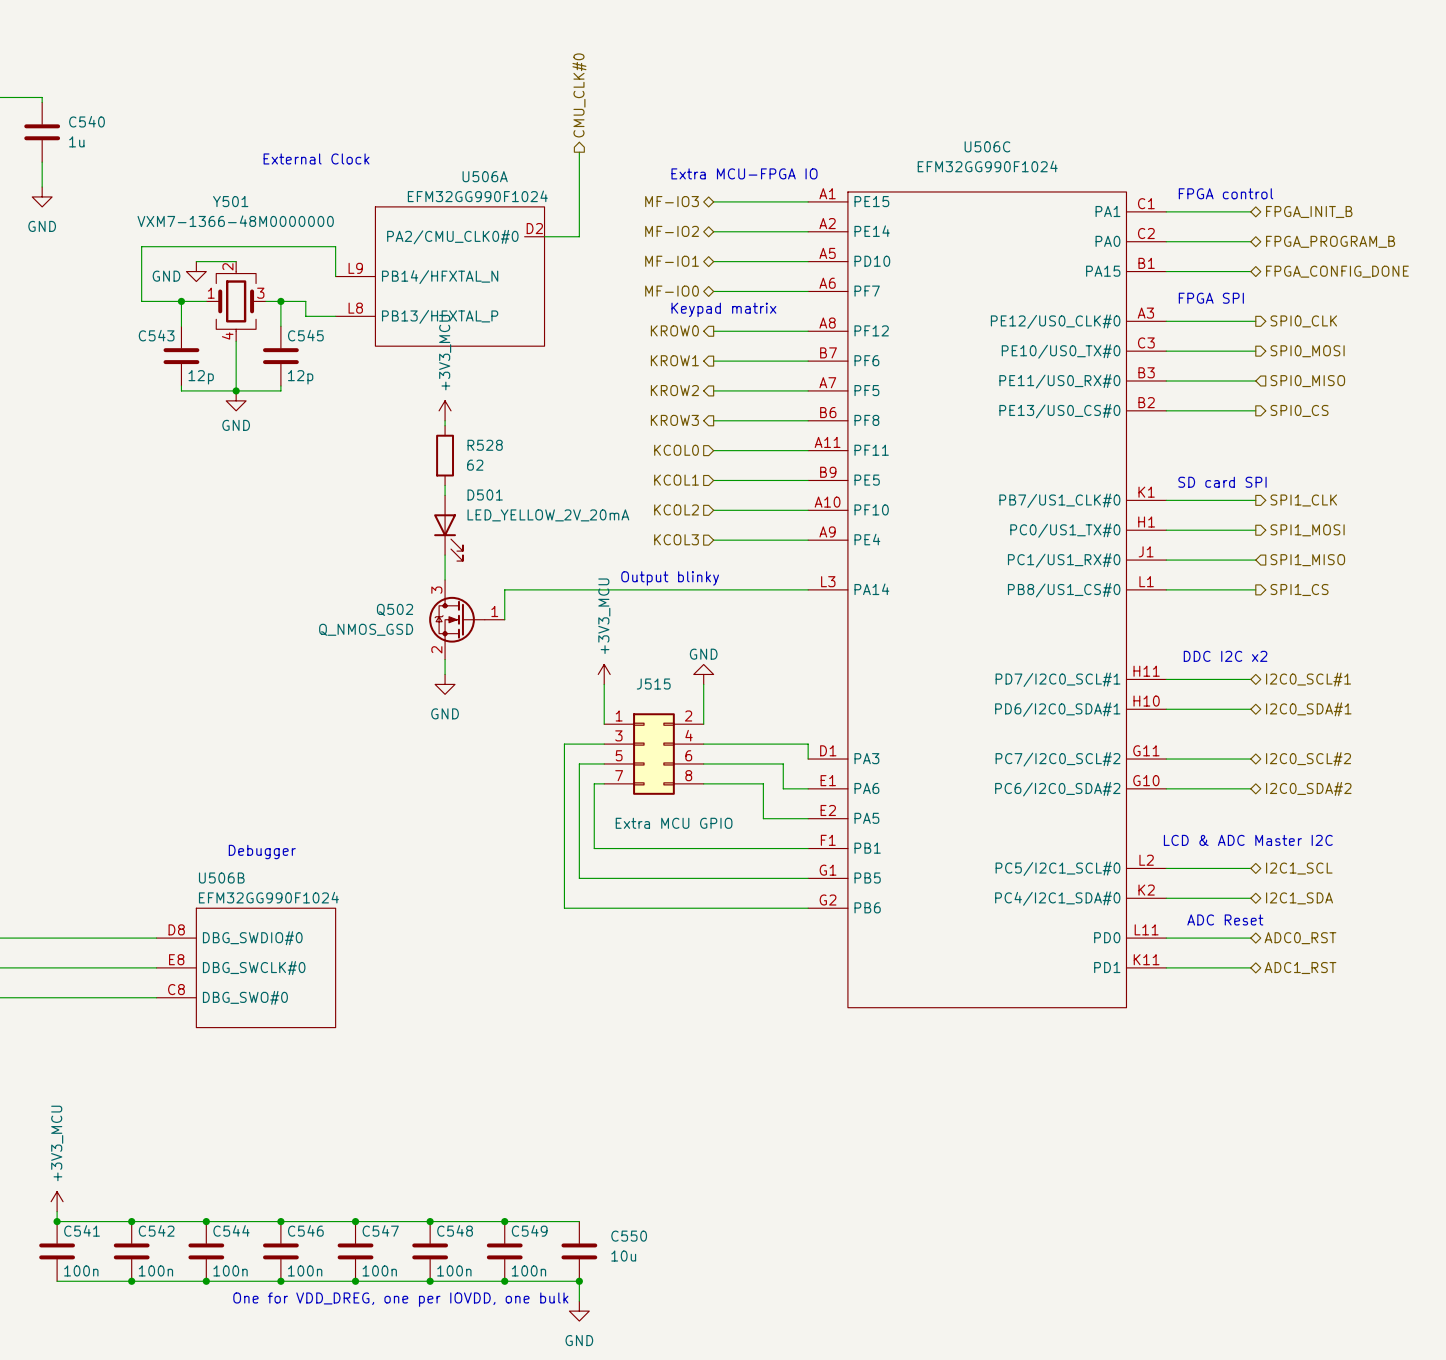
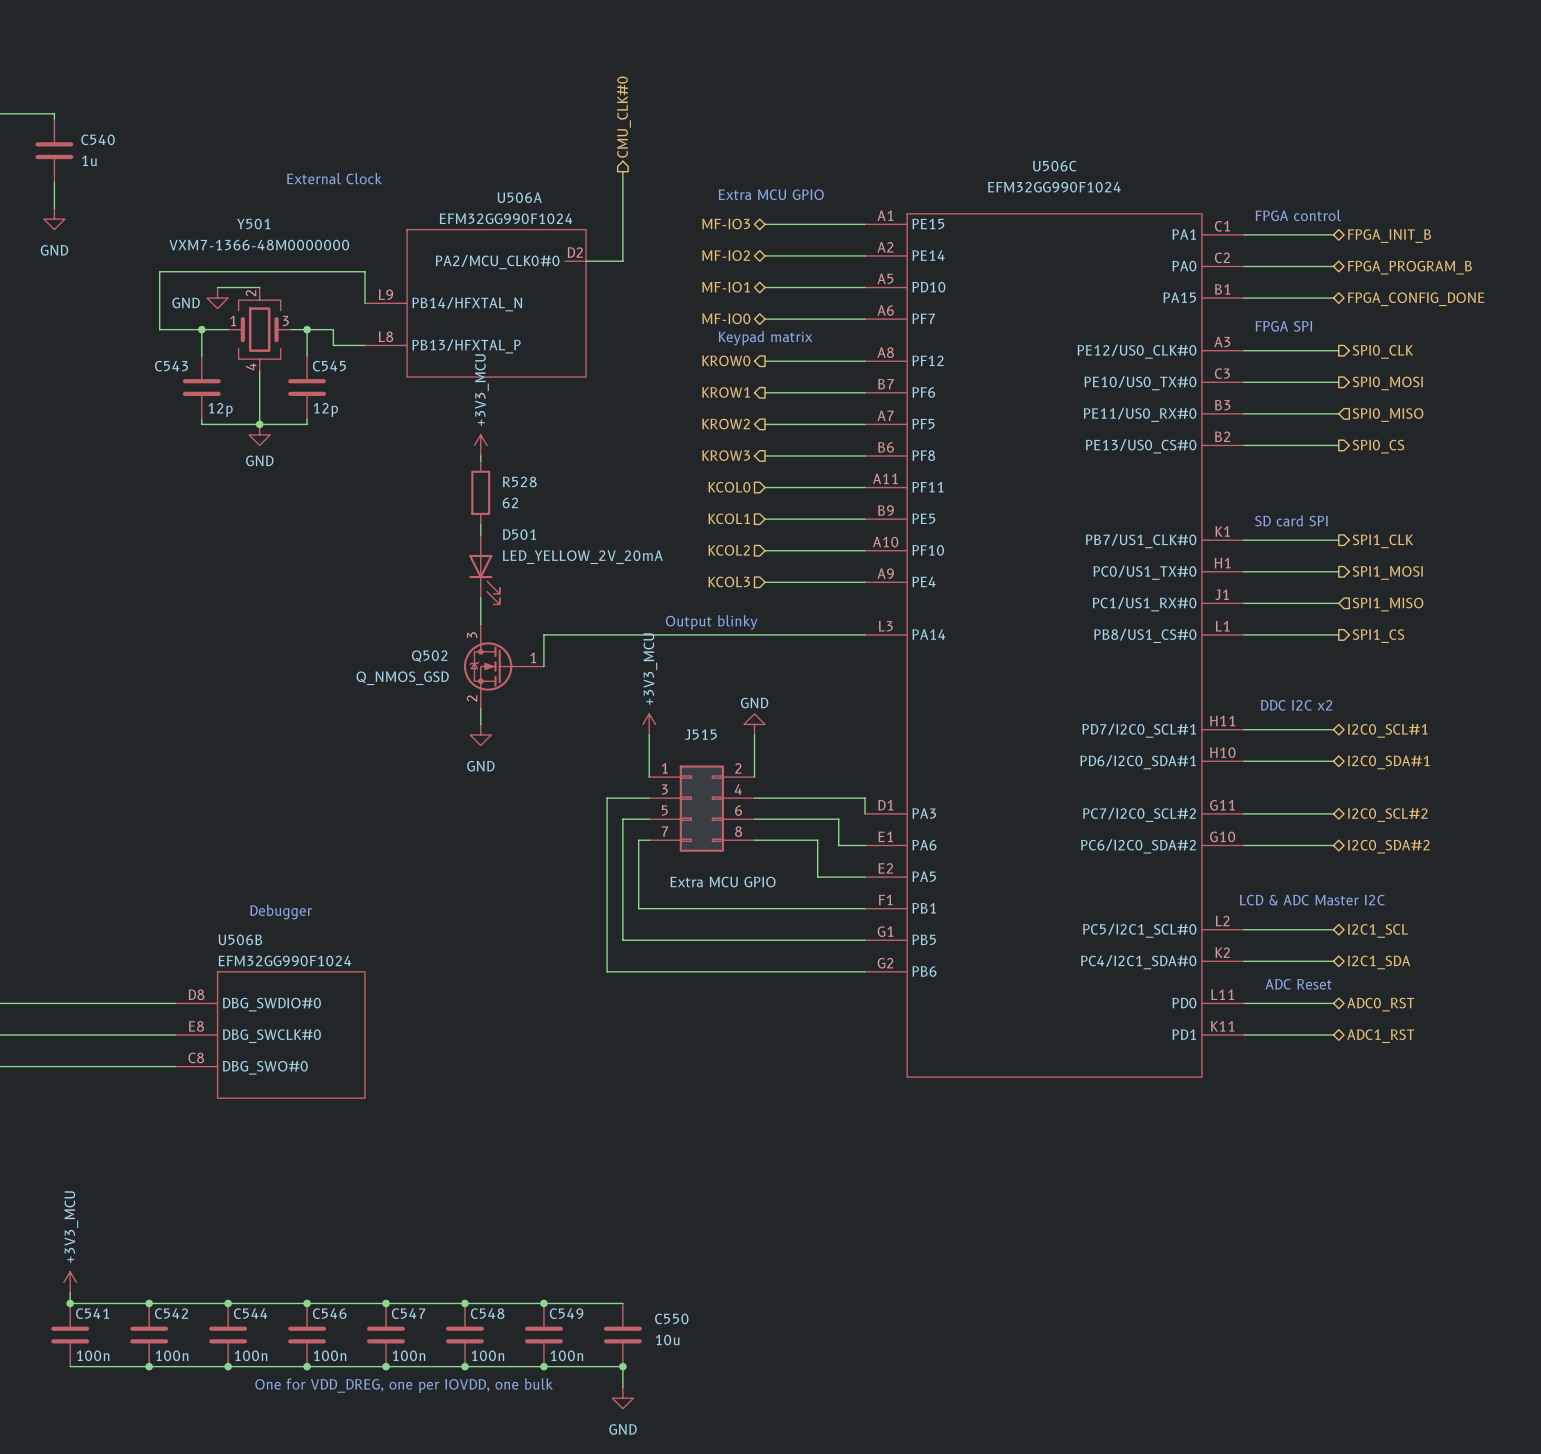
text: Extra MCU-FPGA IO (744, 173) -> Extra MCU GPIO (771, 194)
U506A pin name: PA2/CMU_CLK0#0 (452, 237) -> PA2/MCU_CLK0#0 (497, 262)

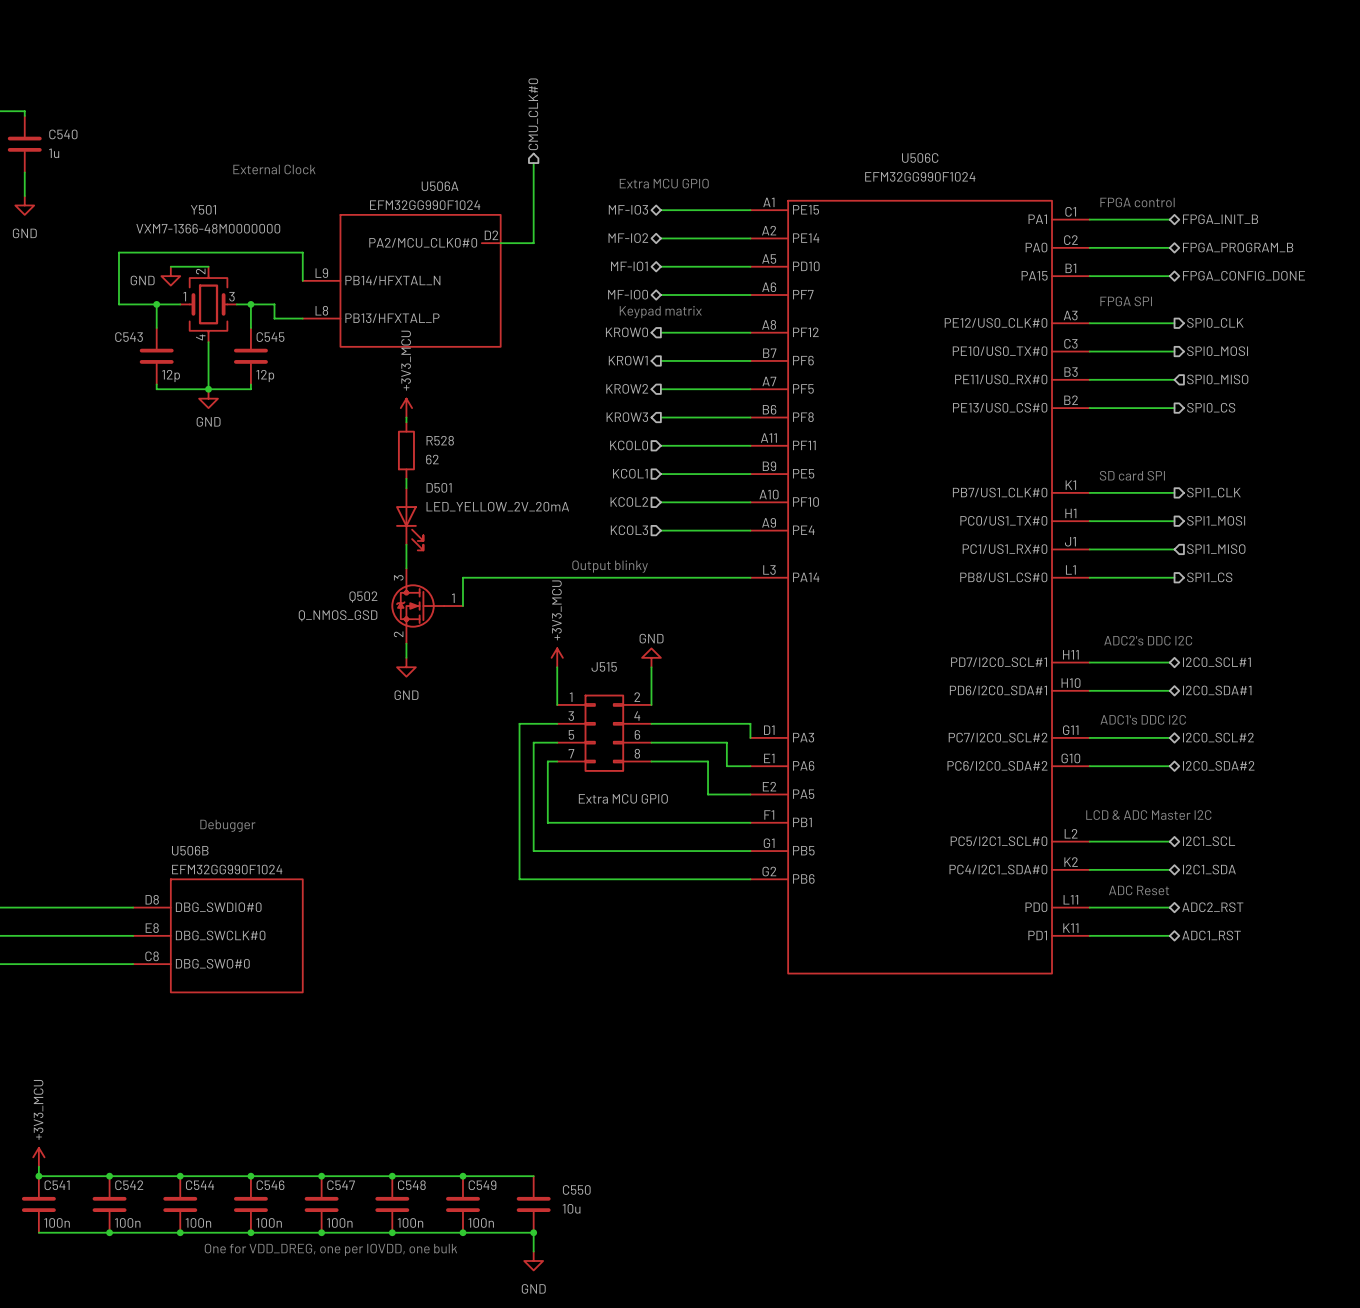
text: DDC I2C x2 (1296, 705) -> ADC2's DDC I2C (1148, 640)
text: none -> ADC1's DDC I2C (1143, 719)
hierarchical label: ADC0_RST (1380, 1004) -> ADC2_RST (1212, 907)

